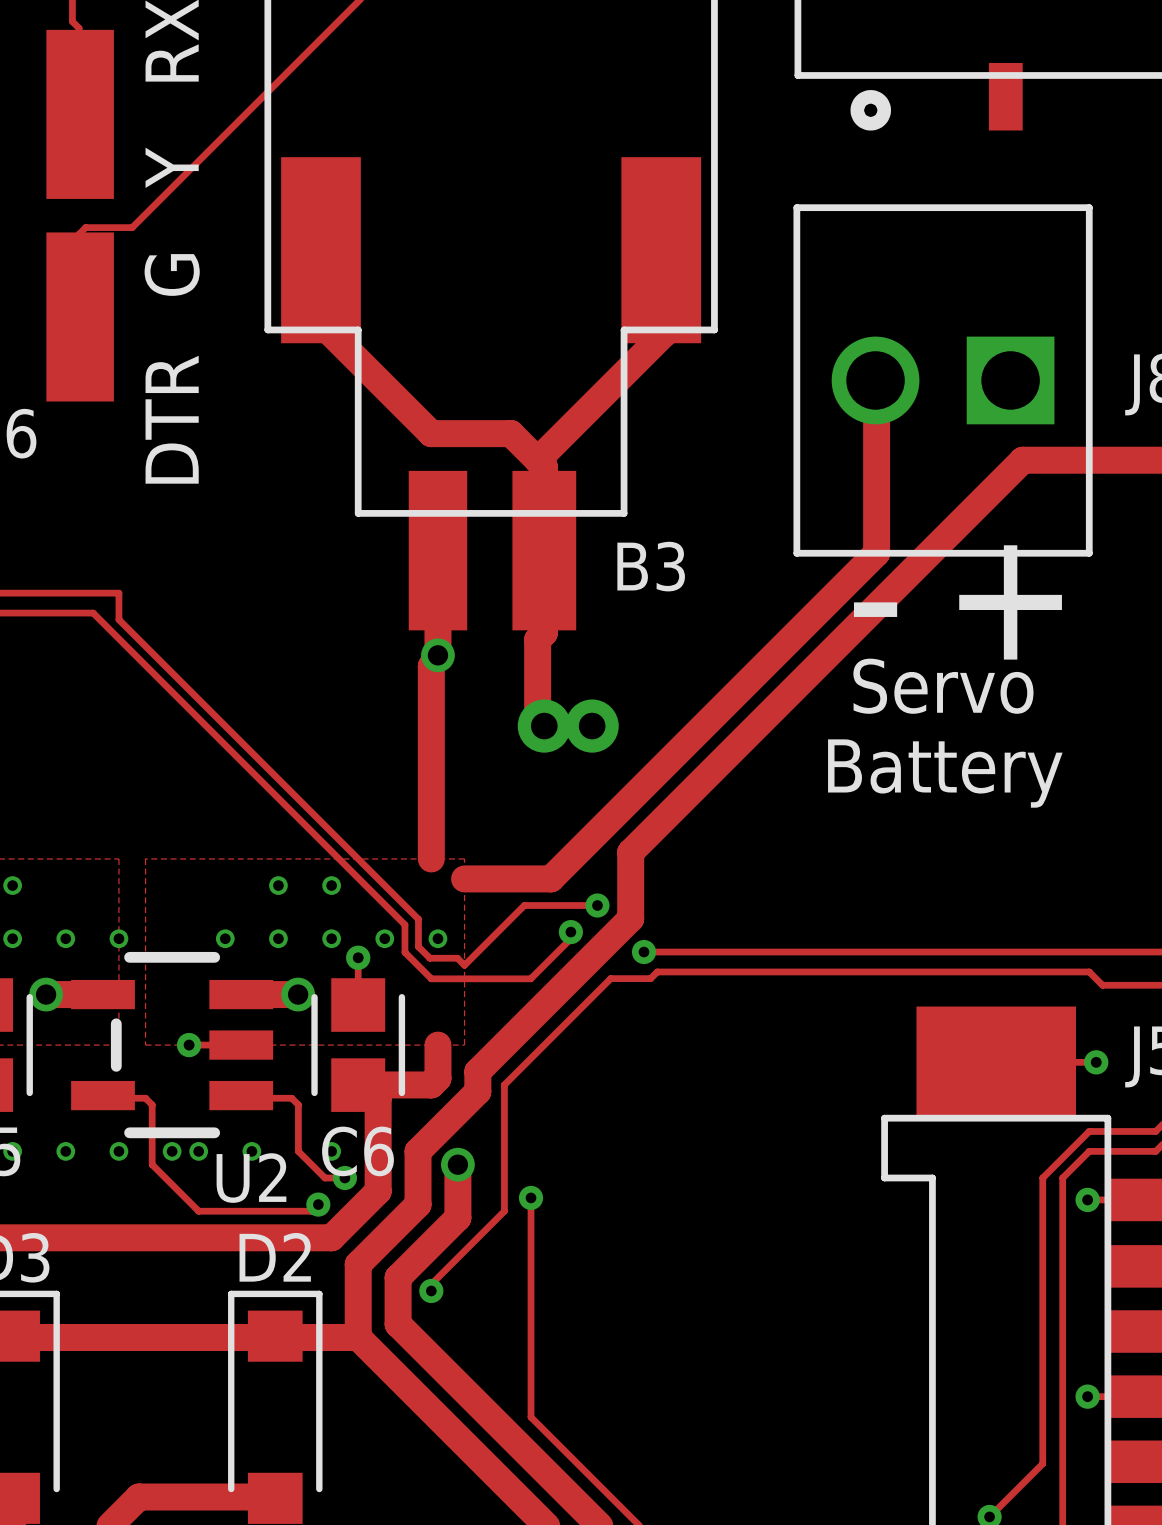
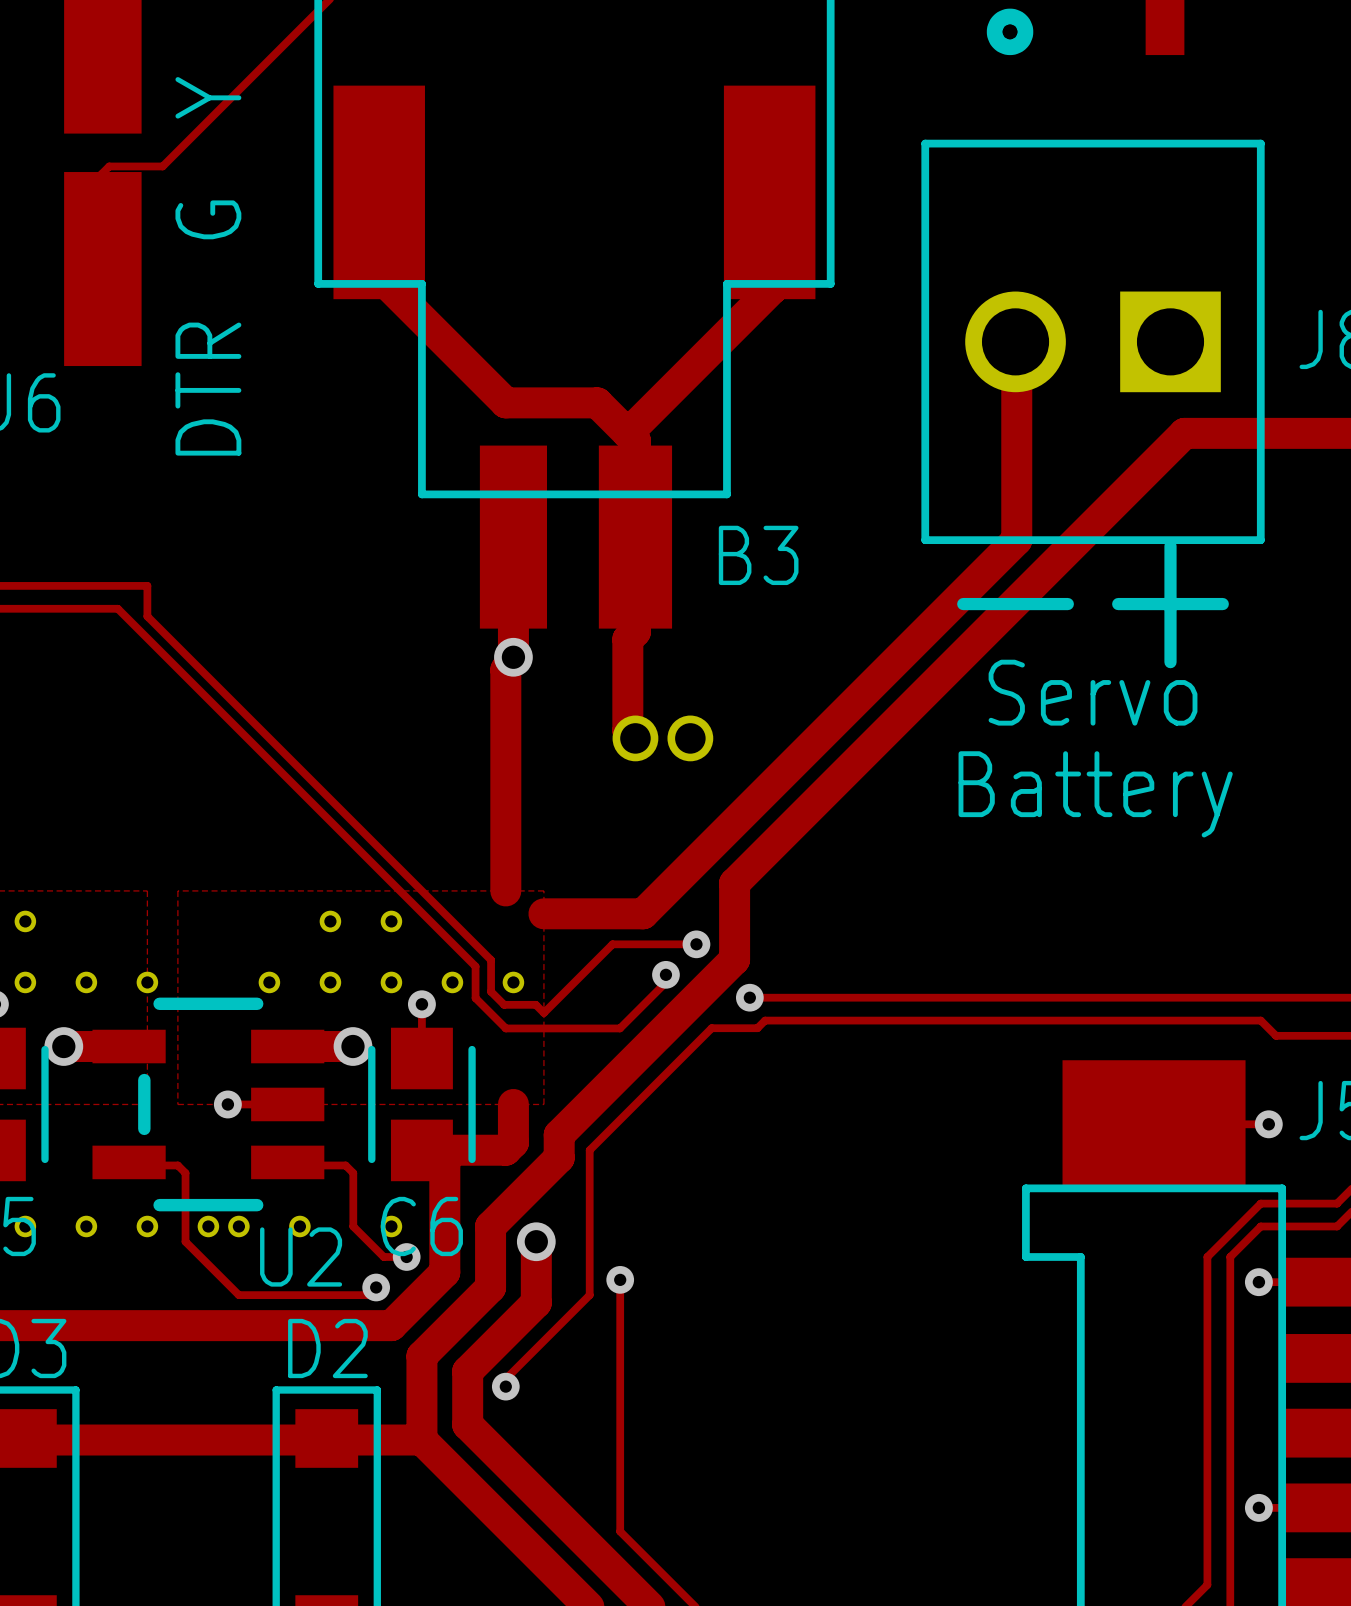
part footprint: [517, 699, 619, 753] -> [612, 715, 714, 762]

